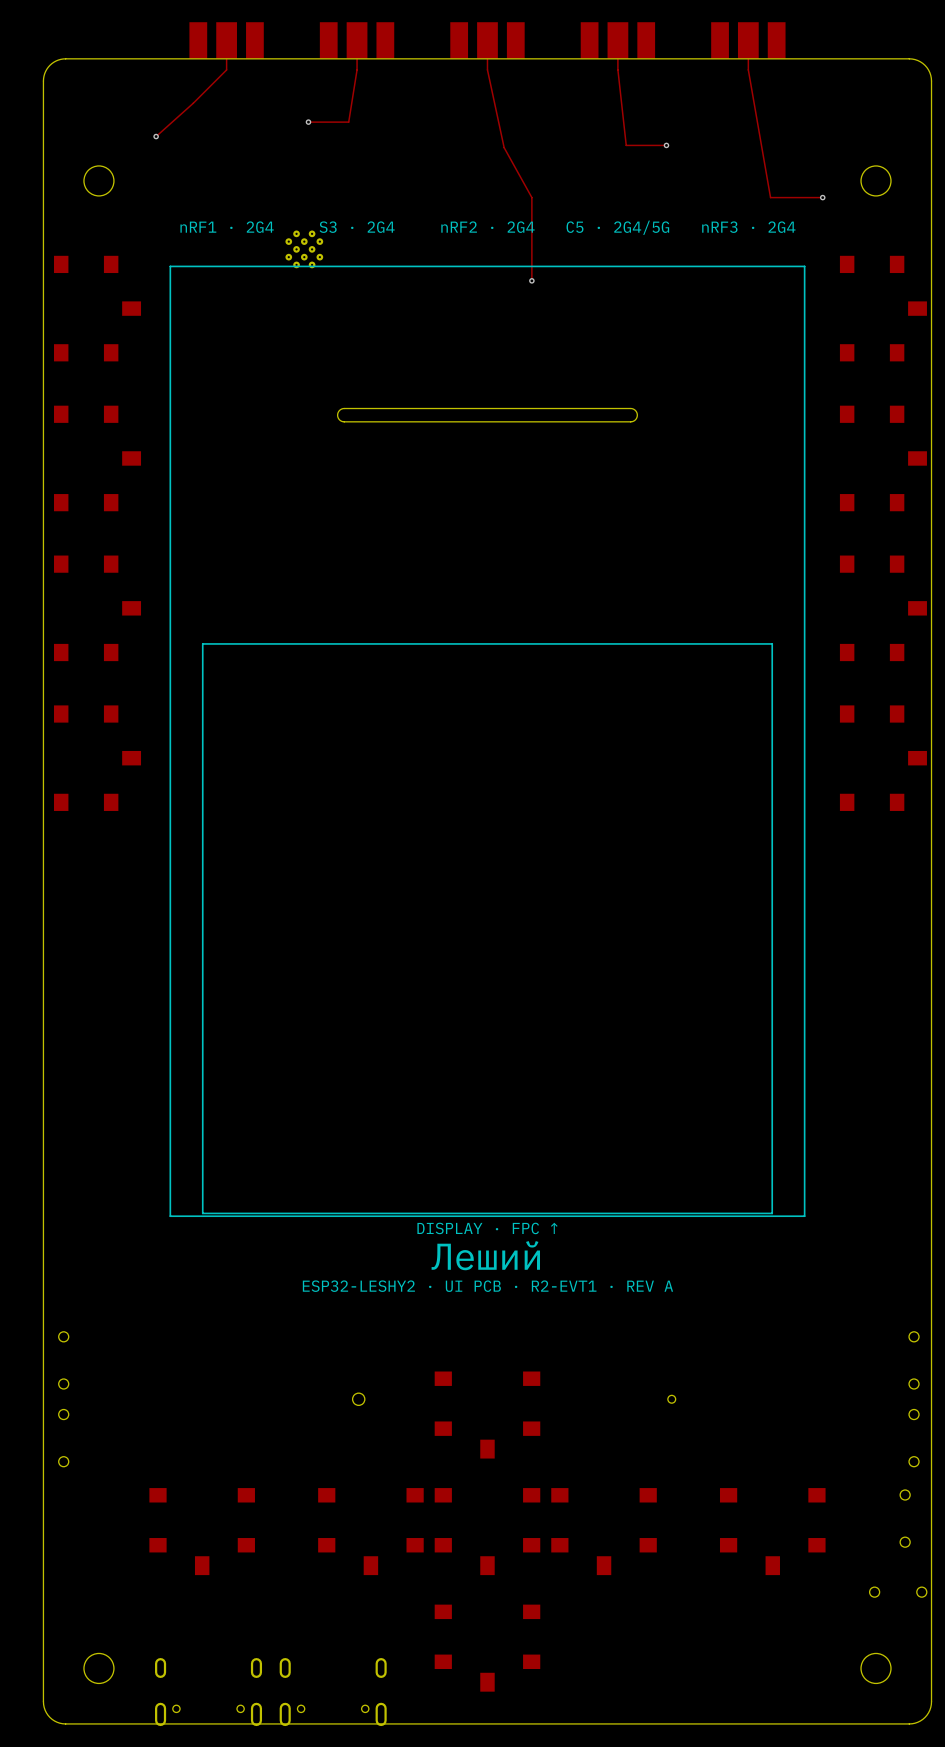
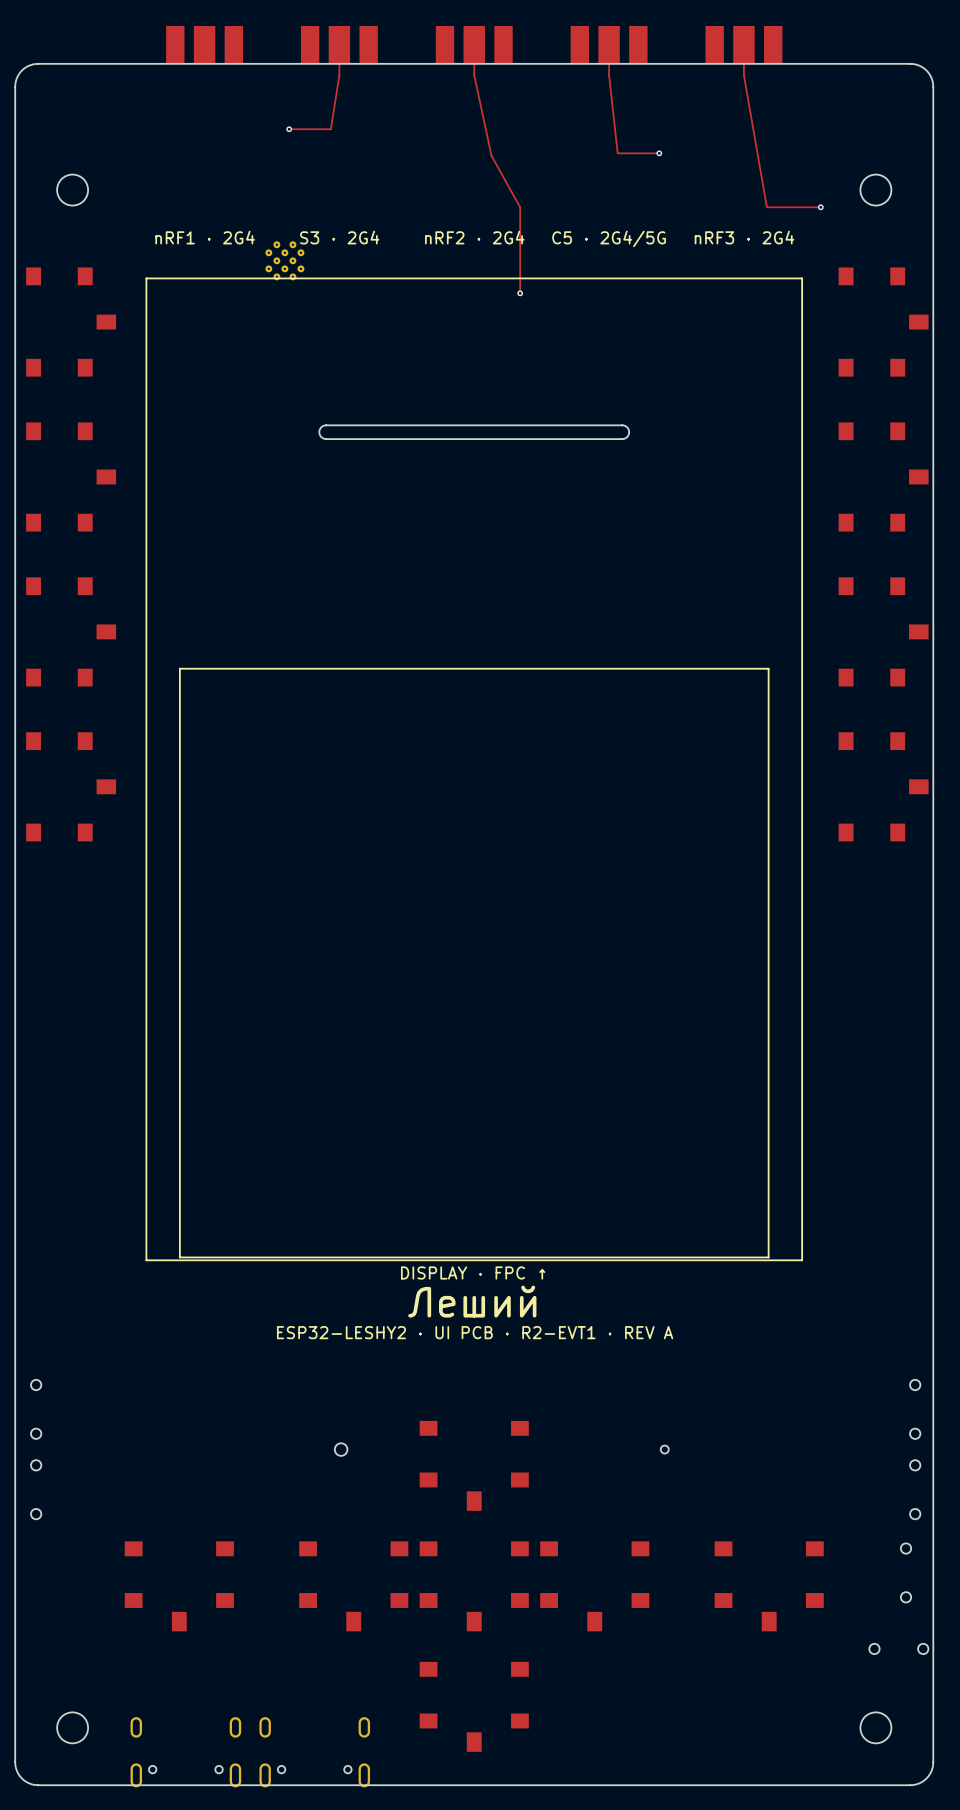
track: (226, 40) (226, 69) (156, 136) -> none
via: (156, 136) -> none

